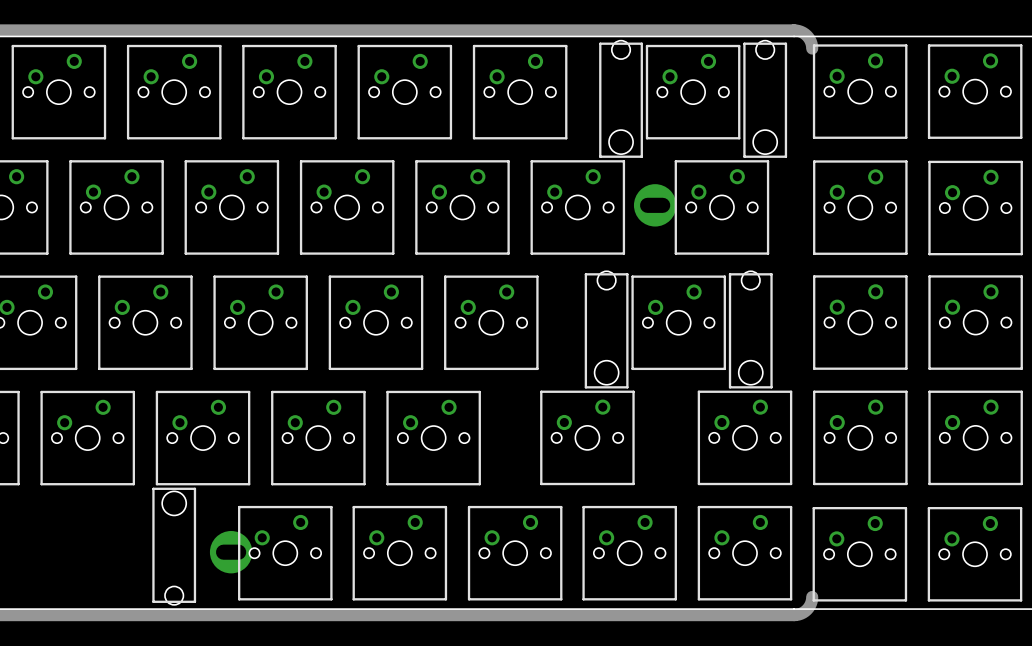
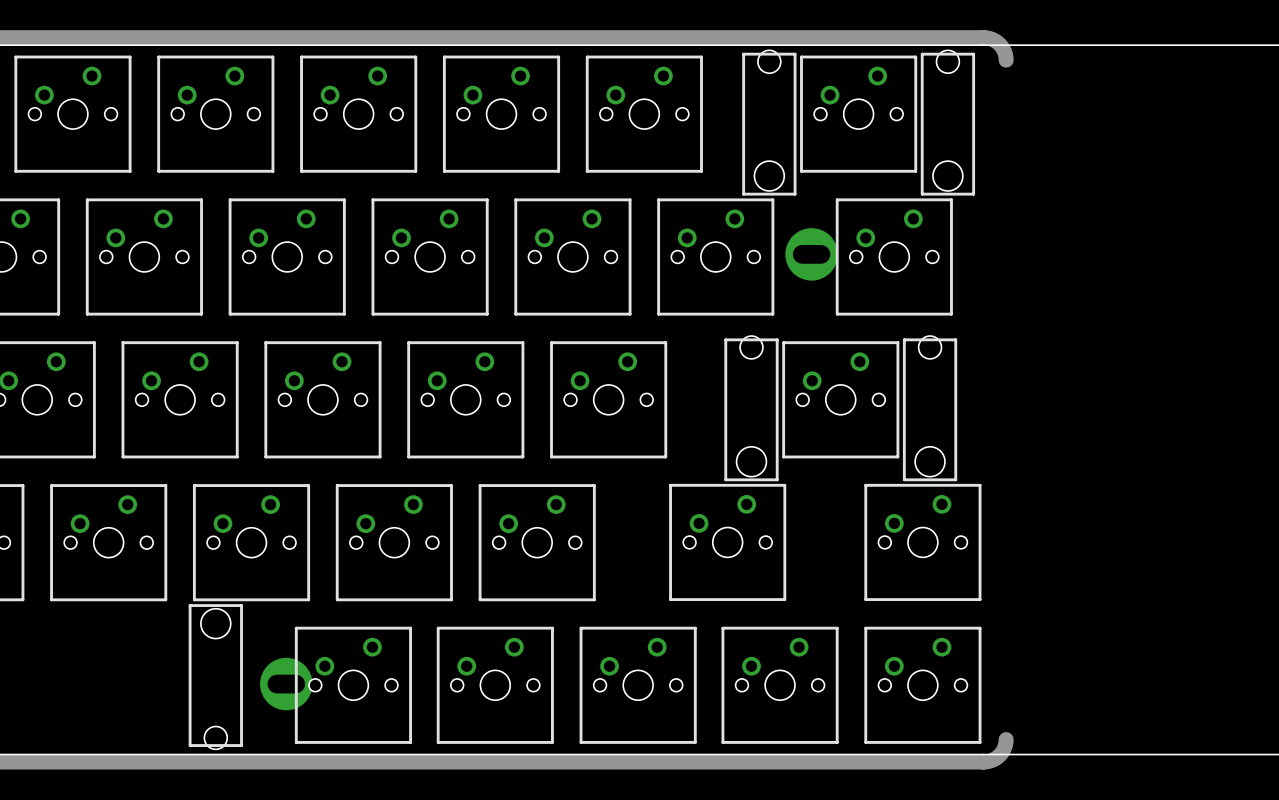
part: (860, 91) -> none
part: (975, 91) -> none
part: (860, 207) -> none
part: (975, 208) -> none
part: (860, 322) -> none
part: (975, 322) -> none
part: (860, 437) -> none
part: (975, 437) -> none
part: (859, 554) -> none
part: (975, 554) -> none

